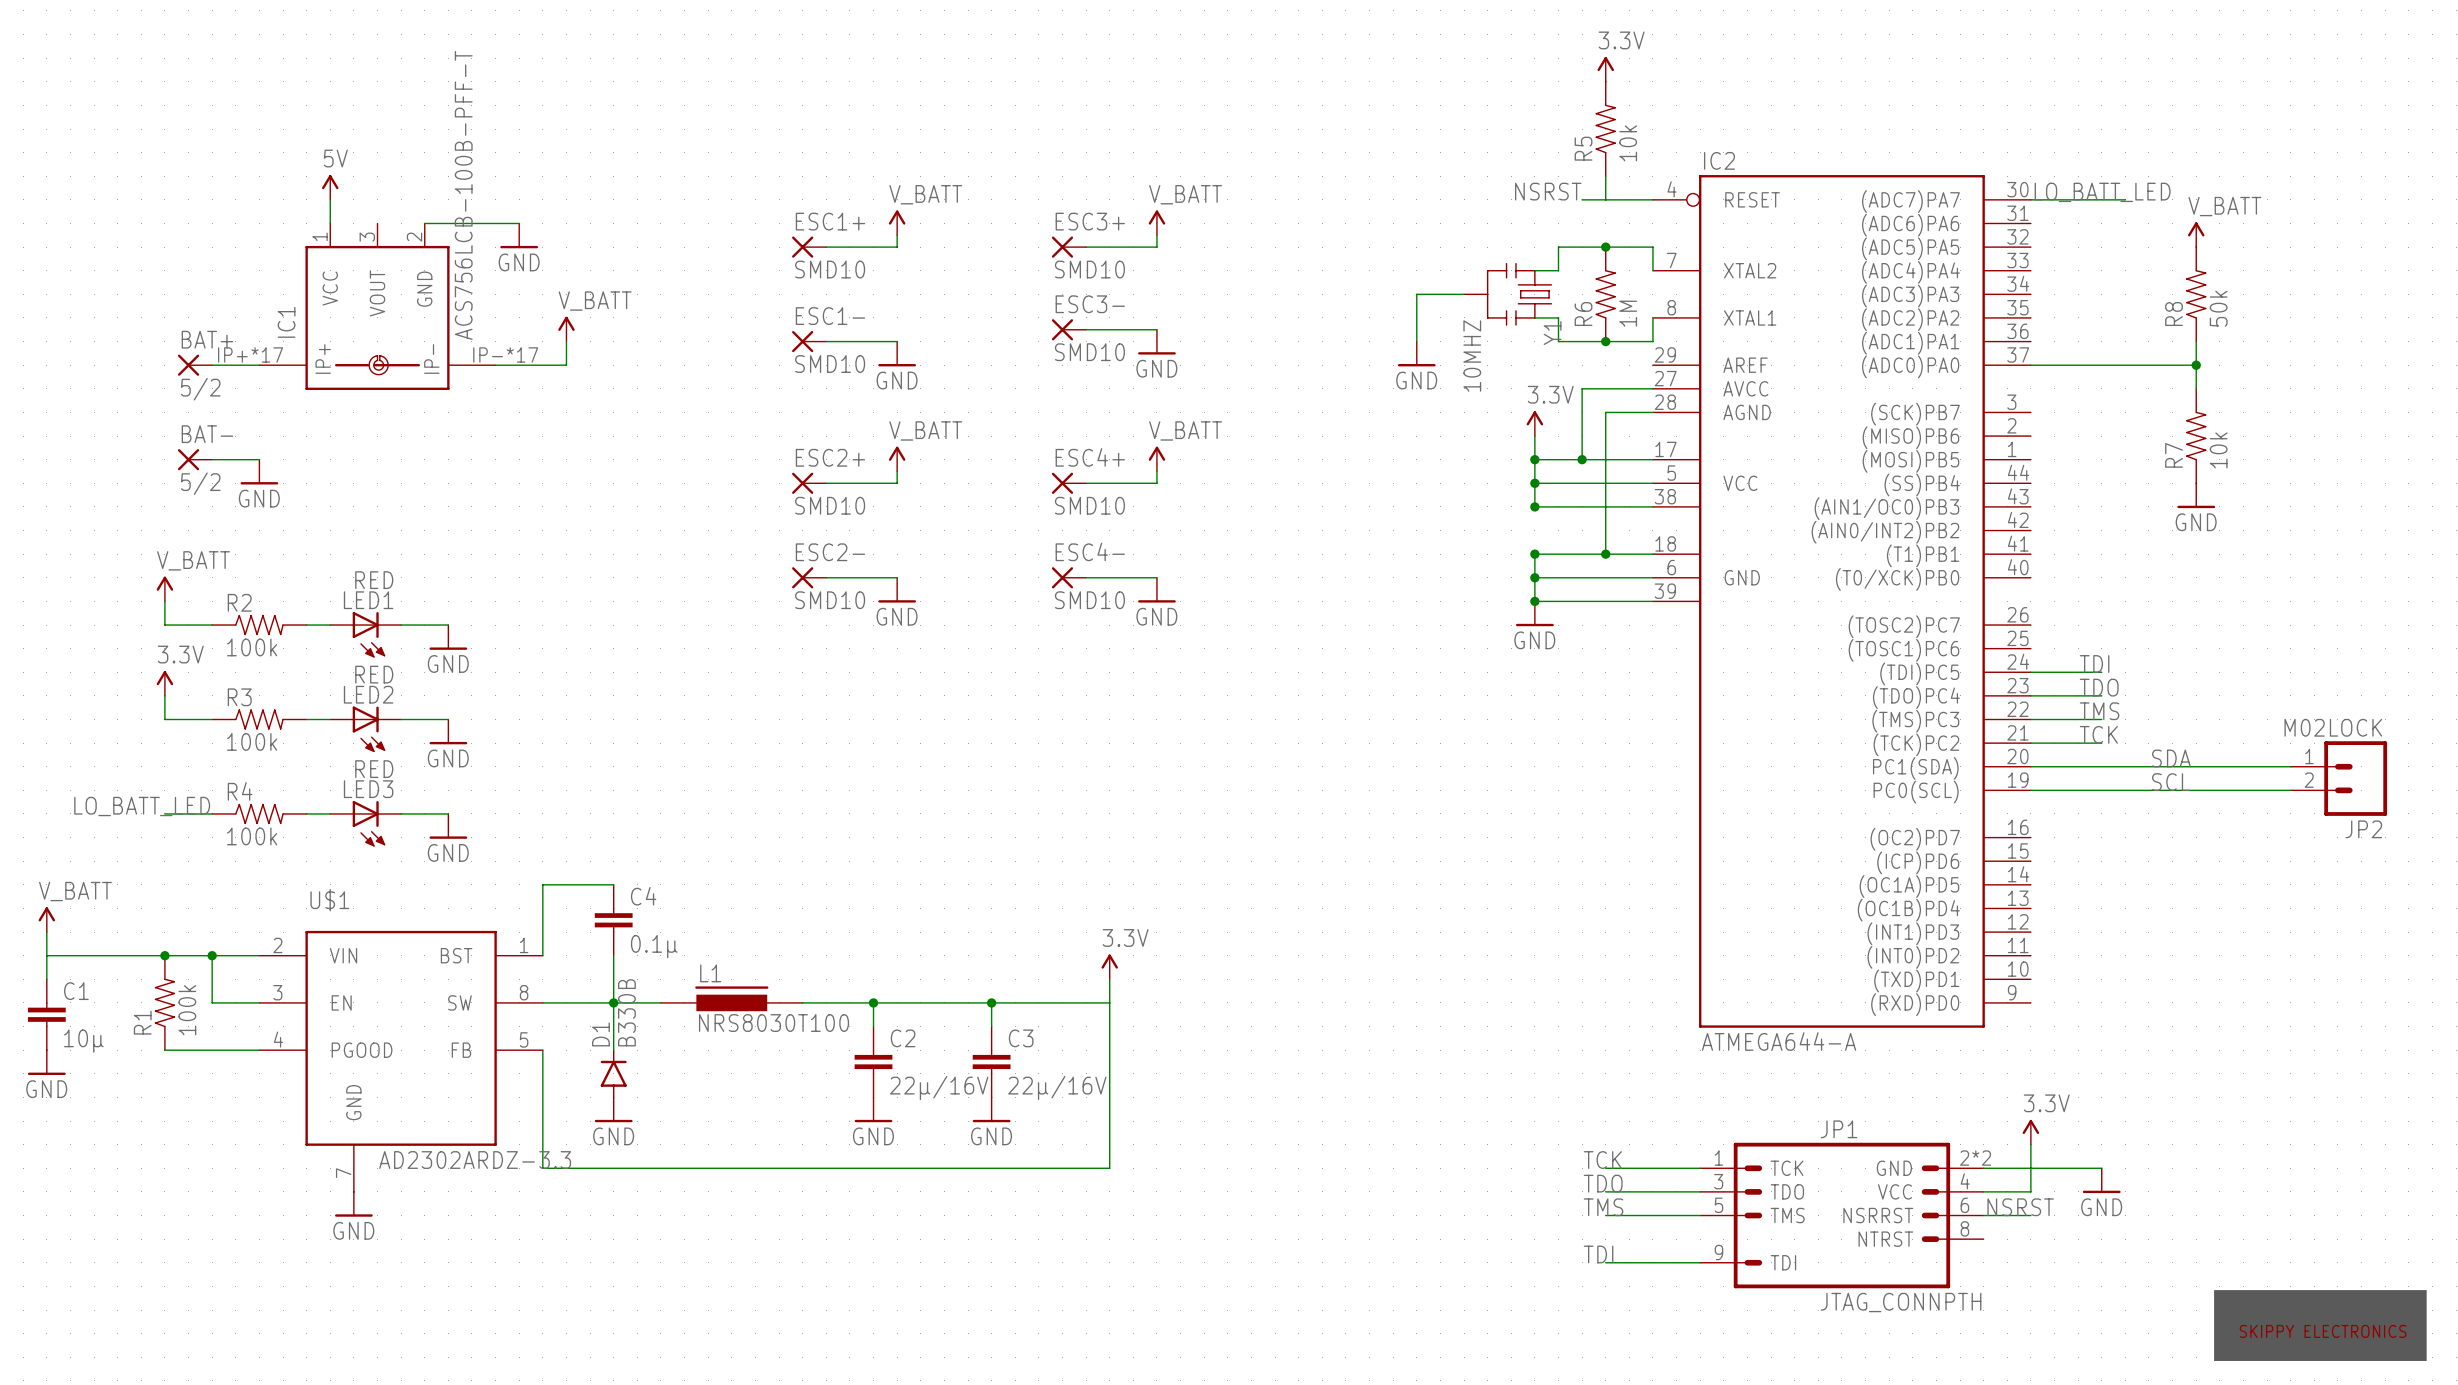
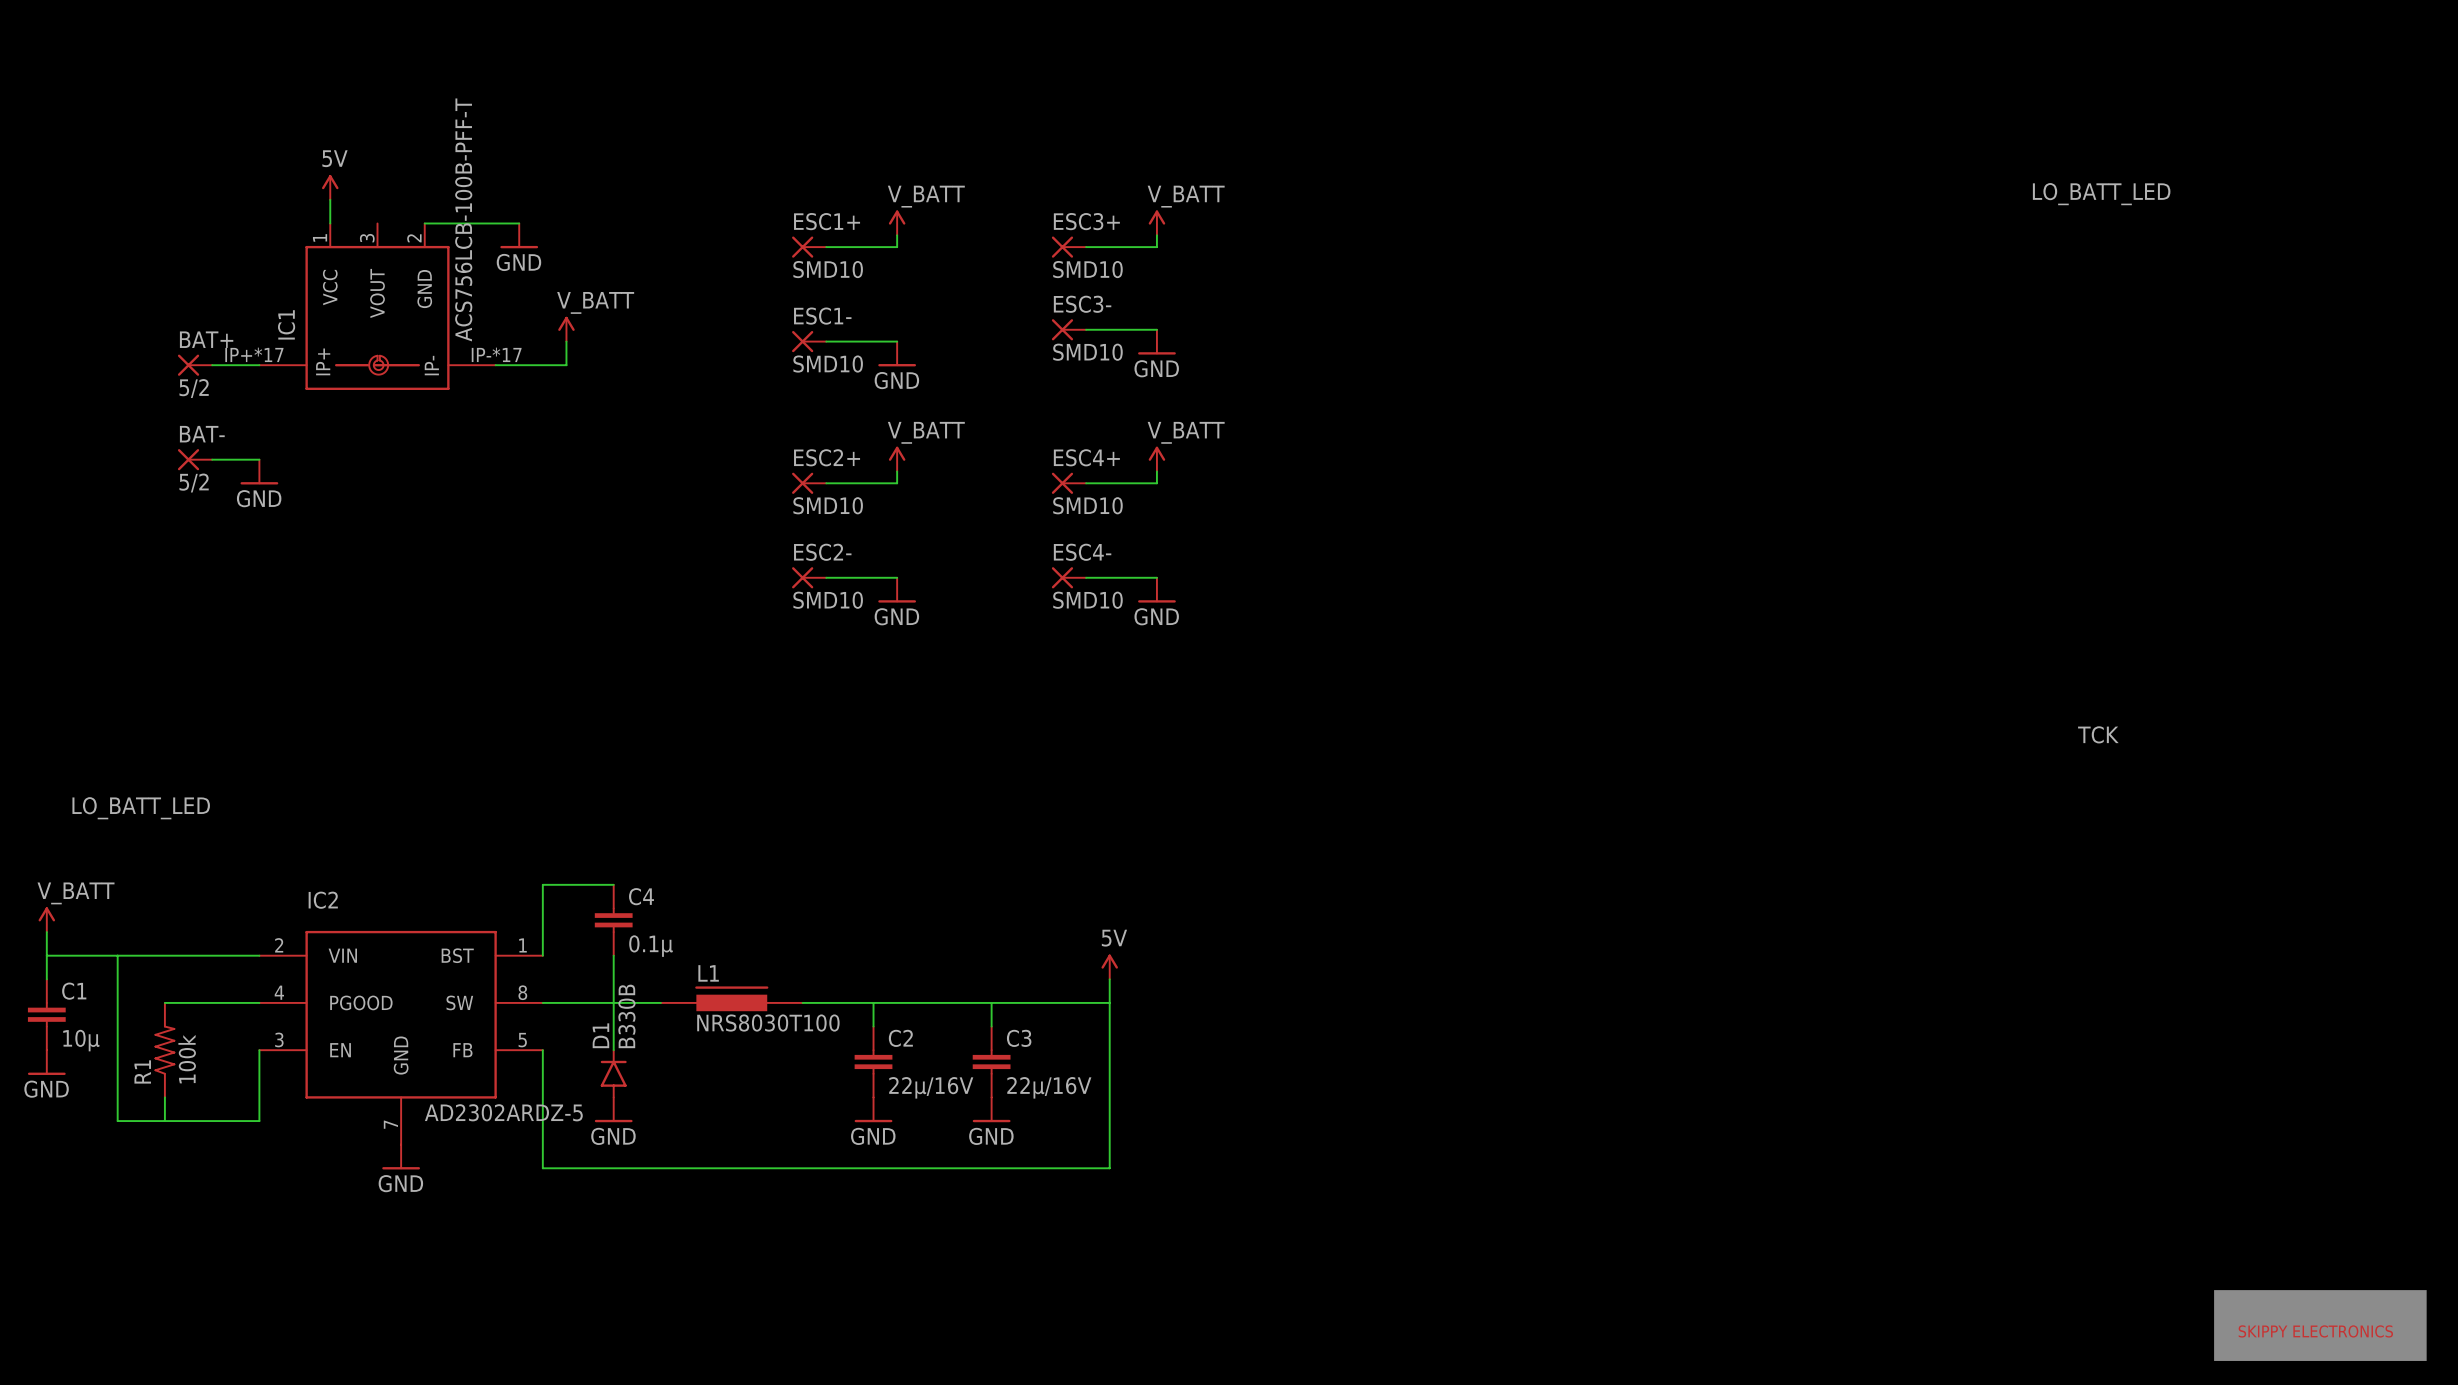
power symbol: 3.3V (1605, 69) -> none
R5: 10k (1605, 129) -> none
IC2 name position: IC2 (1719, 160) -> IC2 (323, 900)
IC2 symbol: [1652, 175, 2031, 1028] -> [259, 930, 543, 1145]
wire: (1605, 176) (1605, 199) -> none
label: NSRST (1548, 191) -> none
wire: (1582, 199) (1652, 199) -> none
wire: (2030, 199) (2125, 199) -> none
power symbol: V_BATT (2196, 234) -> none
junction: (1605, 247) -> none
wire: (1534, 270) (1558, 270) (1558, 247) (1652, 247) (1652, 270) -> none
wire: (1464, 294) (1416, 294) (1416, 341) -> none
Y1: 10MHZ (1507, 294) -> none
R6: 1M (1605, 294) -> none
R8: 50k (2196, 294) -> none
wire: (1534, 317) (1558, 317) (1558, 341) (1652, 341) (1652, 317) -> none
junction: (1605, 341) -> none
wire: (2196, 341) (2196, 388) -> none
power symbol: GND (1416, 353) -> none
wire: (2030, 365) (2196, 365) -> none
junction: (2196, 365) -> none
wire: (1652, 388) (1582, 388) (1582, 459) -> none
wire: (1652, 412) (1605, 412) (1605, 554) -> none
power symbol: 3.3V (1534, 423) -> none
wire: (1534, 436) (1534, 506) (1652, 506) -> none
R7: 10k (2196, 436) -> none
wire: (1534, 459) (1652, 459) -> none
junction: (1534, 459) -> none
junction: (1582, 459) -> none
wire: (1534, 483) (1652, 483) -> none
junction: (1534, 483) -> none
power symbol: GND (2196, 495) -> none
junction: (1534, 506) -> none
junction: (1534, 554) -> none
junction: (1605, 554) -> none
wire: (1652, 554) (1534, 554) (1534, 601) (1652, 601) -> none
wire: (1534, 577) (1652, 577) -> none
junction: (1534, 577) -> none
power symbol: V_BATT (164, 589) -> none
wire: (164, 601) (164, 625) (212, 625) -> none
junction: (1534, 601) -> none
power symbol: GND (1534, 613) -> none
R2: 100k (259, 625) -> none
wire: (306, 625) (330, 625) -> none
wire: (401, 625) (448, 625) -> none
LED1: RED (365, 634) -> none
power symbol: GND (448, 637) -> none
label: TDI (2094, 663) -> none
wire: (2030, 672) (2101, 672) -> none
power symbol: 3.3V (164, 683) -> none
label: TDO (2099, 687) -> none
wire: (164, 695) (164, 719) (212, 719) -> none
wire: (2030, 695) (2101, 695) -> none
label: TMS (2099, 711) -> none
R3: 100k (259, 719) -> none
wire: (306, 719) (330, 719) -> none
wire: (401, 719) (448, 719) -> none
wire: (2030, 719) (2101, 719) -> none
LED2: RED (365, 729) -> none
power symbol: GND (448, 731) -> none
wire: (2030, 743) (2101, 743) -> none
label: SDA (2171, 758) -> none
wire: (2030, 766) (2290, 766) -> none
JP2: M02LOCK (2338, 778) -> none
label: SCL (2171, 782) -> none
wire: (2030, 790) (2290, 790) -> none
wire: (164, 813) (212, 813) -> none
R4: 100k (259, 813) -> none
wire: (306, 813) (330, 813) -> none
wire: (401, 813) (448, 813) -> none
LED3: RED (365, 823) -> none
power symbol: GND (448, 826) -> none
junction: (164, 955) -> none
wire: (212, 955) (212, 1002) -> (164, 1002) (212, 1002)
junction: (212, 955) -> none
power symbol: 3.3V (1109, 966) -> 5V (1109, 966)
R1 position: (164, 1002) -> (164, 1050)
junction: (613, 1002) -> none
junction: (873, 1002) -> none
junction: (991, 1002) -> none
IC2 value: ATMEGA644-A (1779, 1041) -> AD2302ARDZ-5 (503, 1112)
wire: (164, 1050) (259, 1050) -> (117, 955) (117, 1121) (259, 1121) (259, 1050)
U$1: AD2302ARDZ-3.3 (401, 1061) -> none
wire: none -> (164, 1097) (164, 1121)
power symbol: 3.3V (2030, 1132) -> none
wire: (2030, 1144) (2030, 1191) (1983, 1191) -> none
label: TCK (1602, 1160) -> none
wire: (1605, 1168) (1700, 1168) -> none
wire: (1983, 1168) (2101, 1168) -> none
power symbol: GND (2101, 1180) -> none
label: TDO (1603, 1183) -> none
wire: (1605, 1191) (1700, 1191) -> none
power symbol position: GND (353, 1204) -> GND (401, 1157)
label: TMS (1603, 1207) -> none
label: NSRST (2020, 1207) -> none
wire: (1605, 1215) (1700, 1215) -> none
JP1: JTAG_CONNPTH (1841, 1215) -> none
wire: (1983, 1215) (2030, 1215) -> none
label: TDI (1598, 1254) -> none
wire: (1605, 1262) (1700, 1262) -> none

